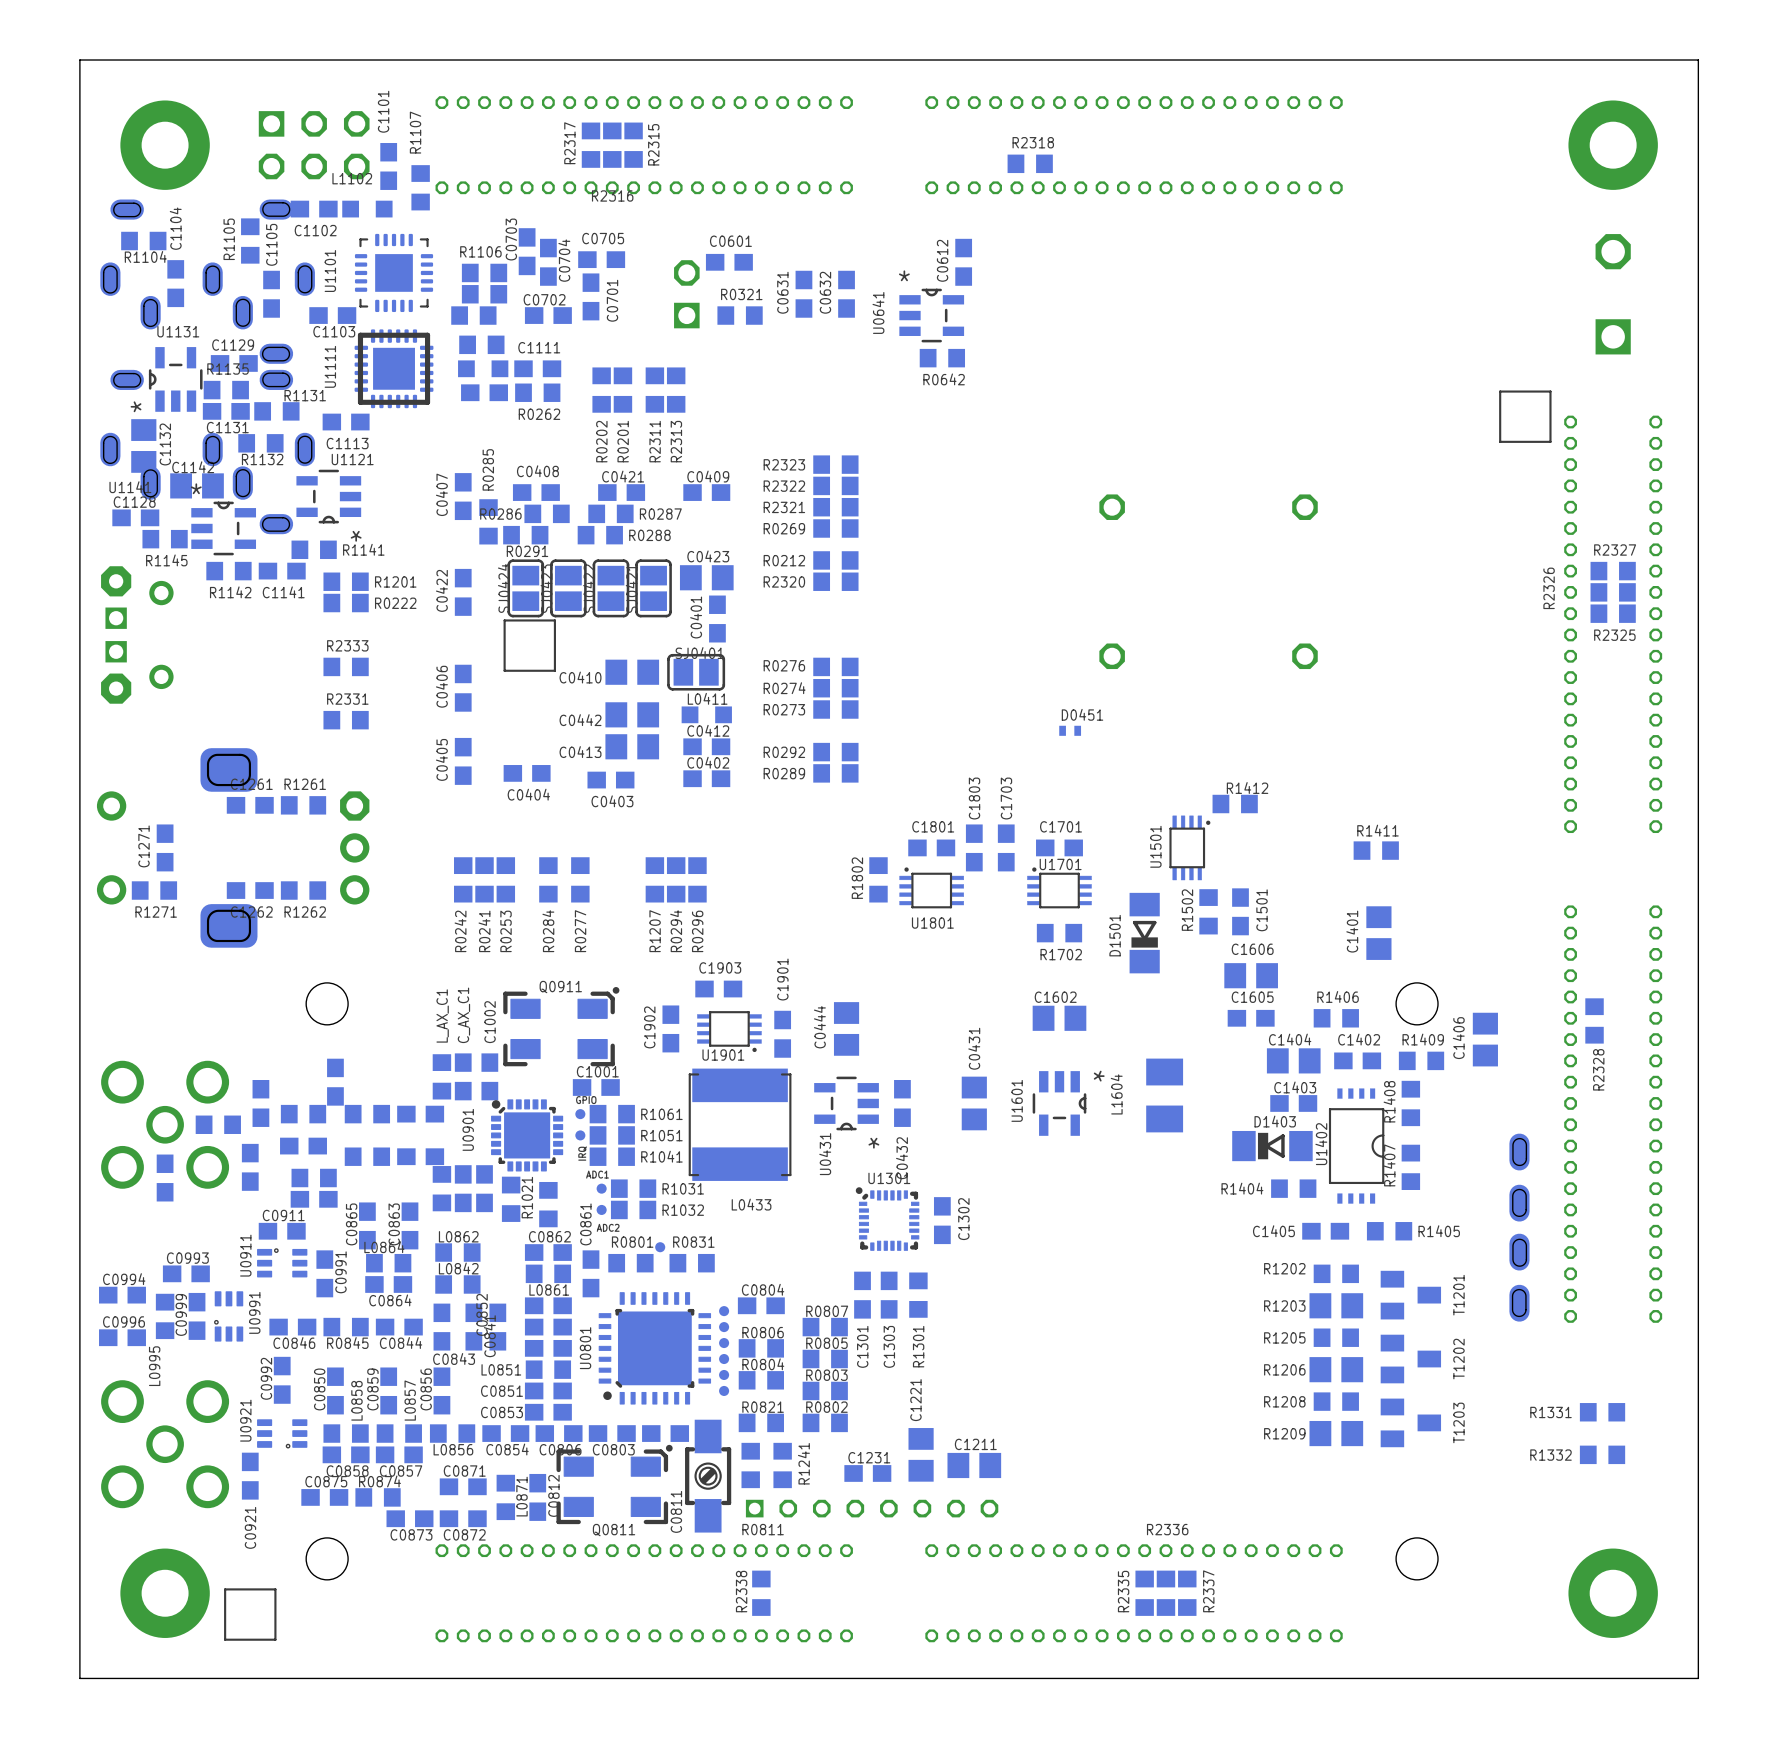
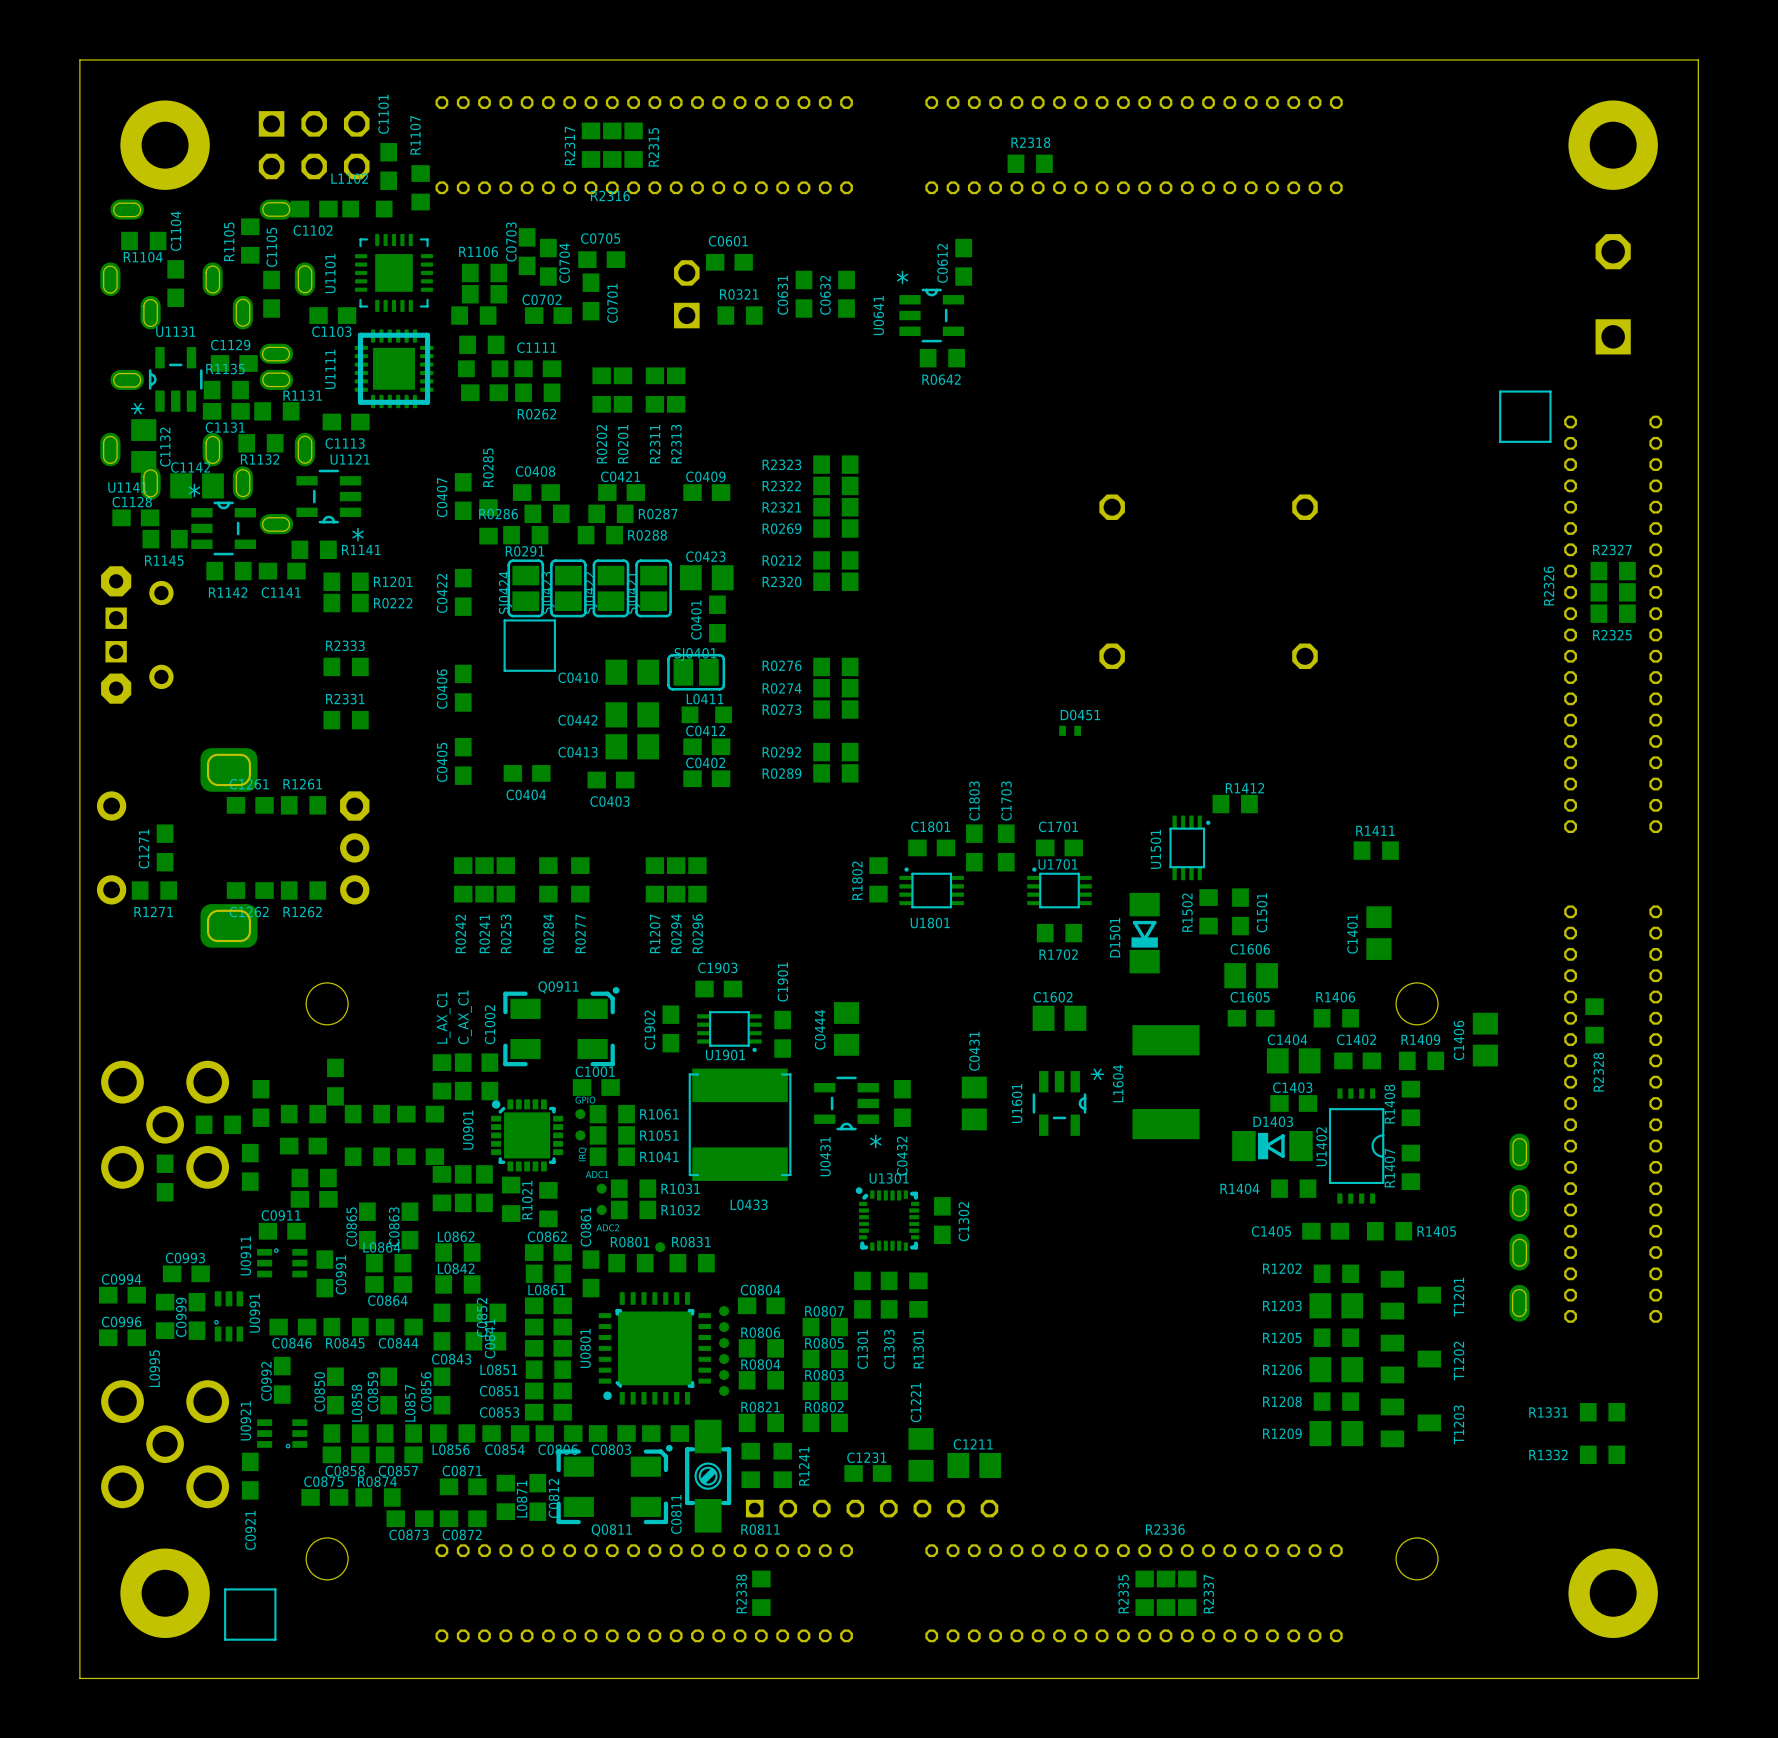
L1604 footprint: [1146, 1058, 1184, 1133] -> [1132, 1025, 1200, 1140]

